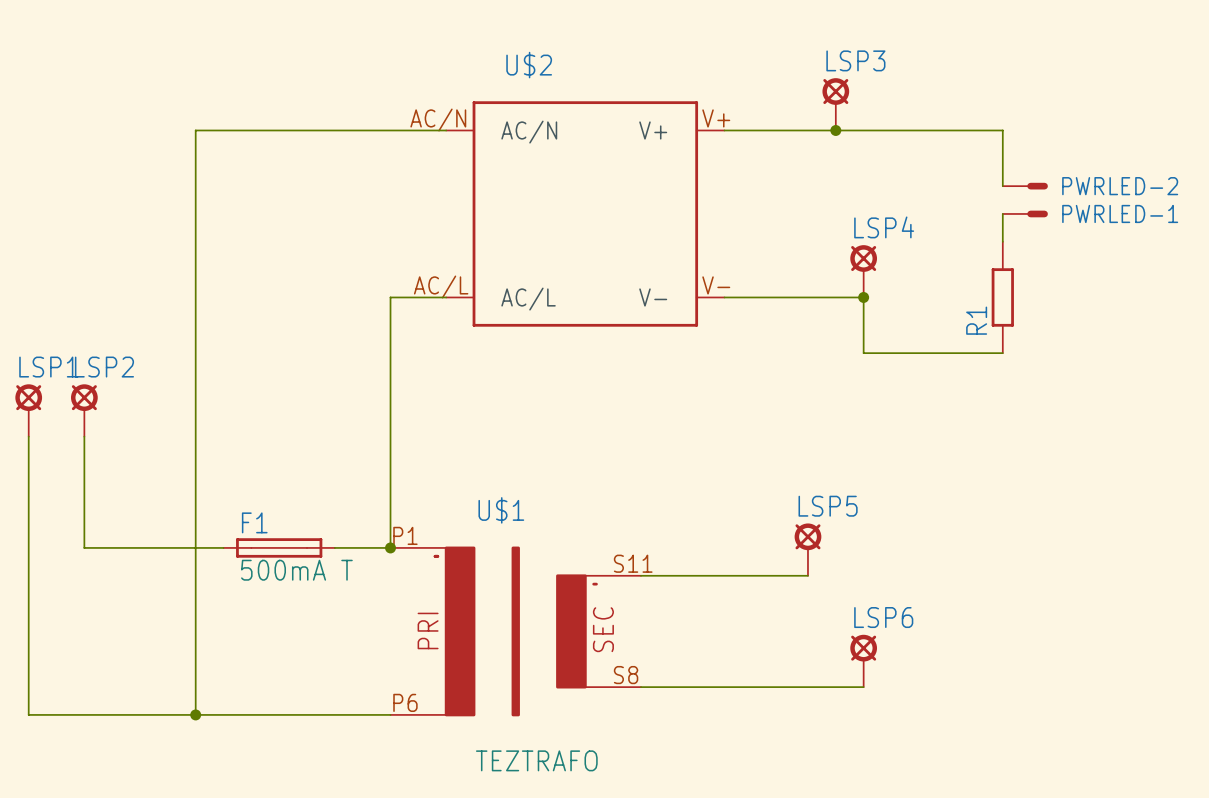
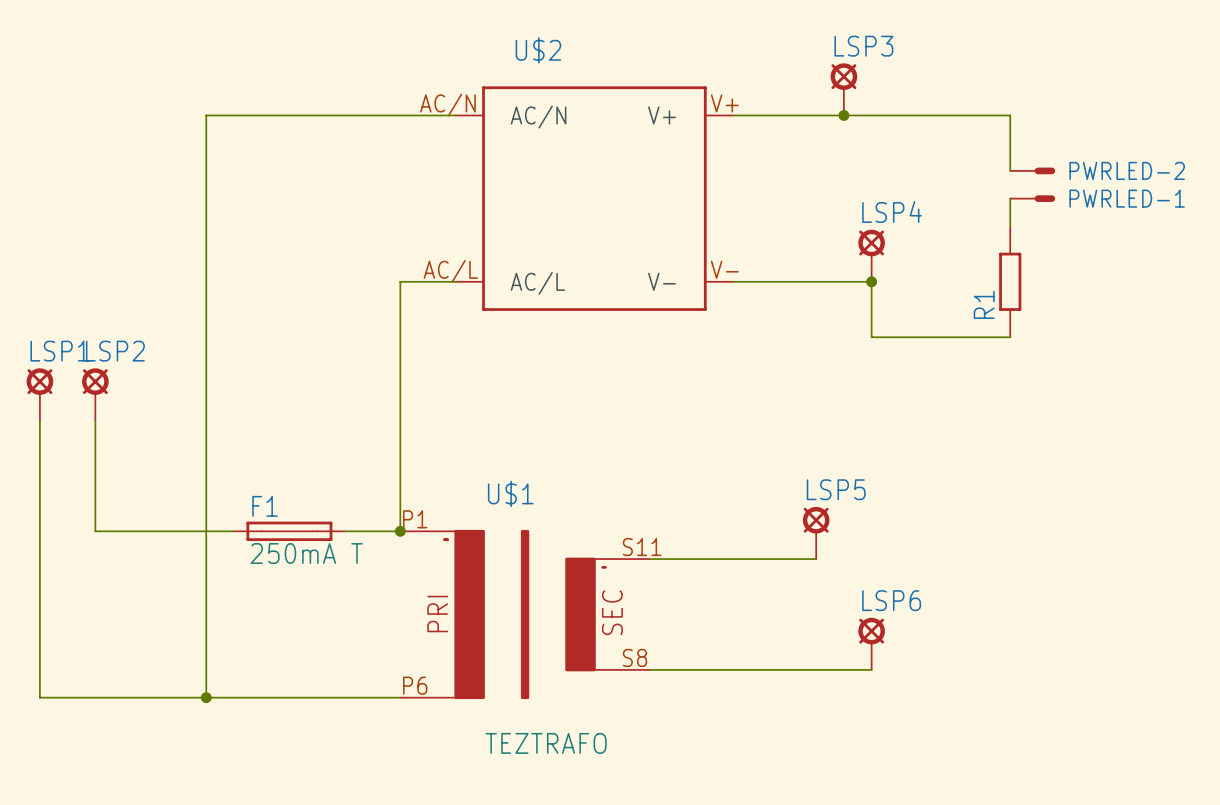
F1 value: 500mA T (296, 570) -> 250mA T (306, 553)

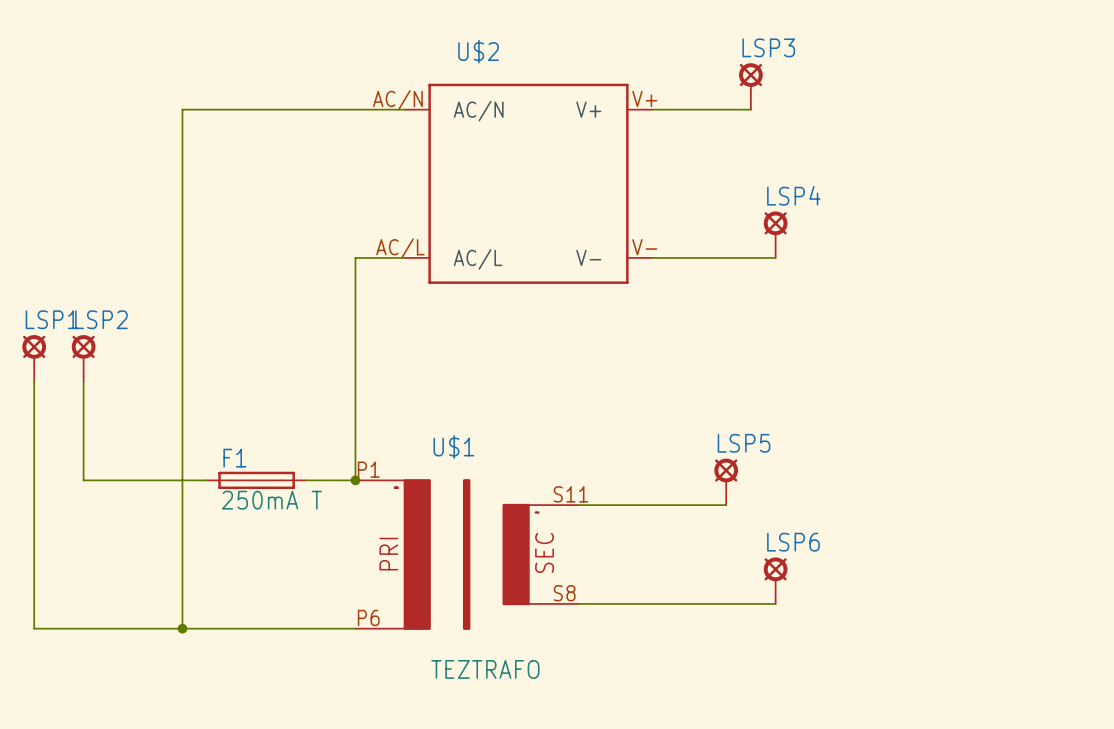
wire: (843, 115) (1010, 115) (1010, 170) -> none
junction: (843, 115) -> none
PWRLED-2: (1032, 170) -> none
wire: (1010, 198) (1010, 226) -> none
PWRLED-1: (1032, 198) -> none
wire: (871, 281) (871, 337) (1010, 337) -> none
junction: (871, 281) -> none
R1: (1010, 281) -> none

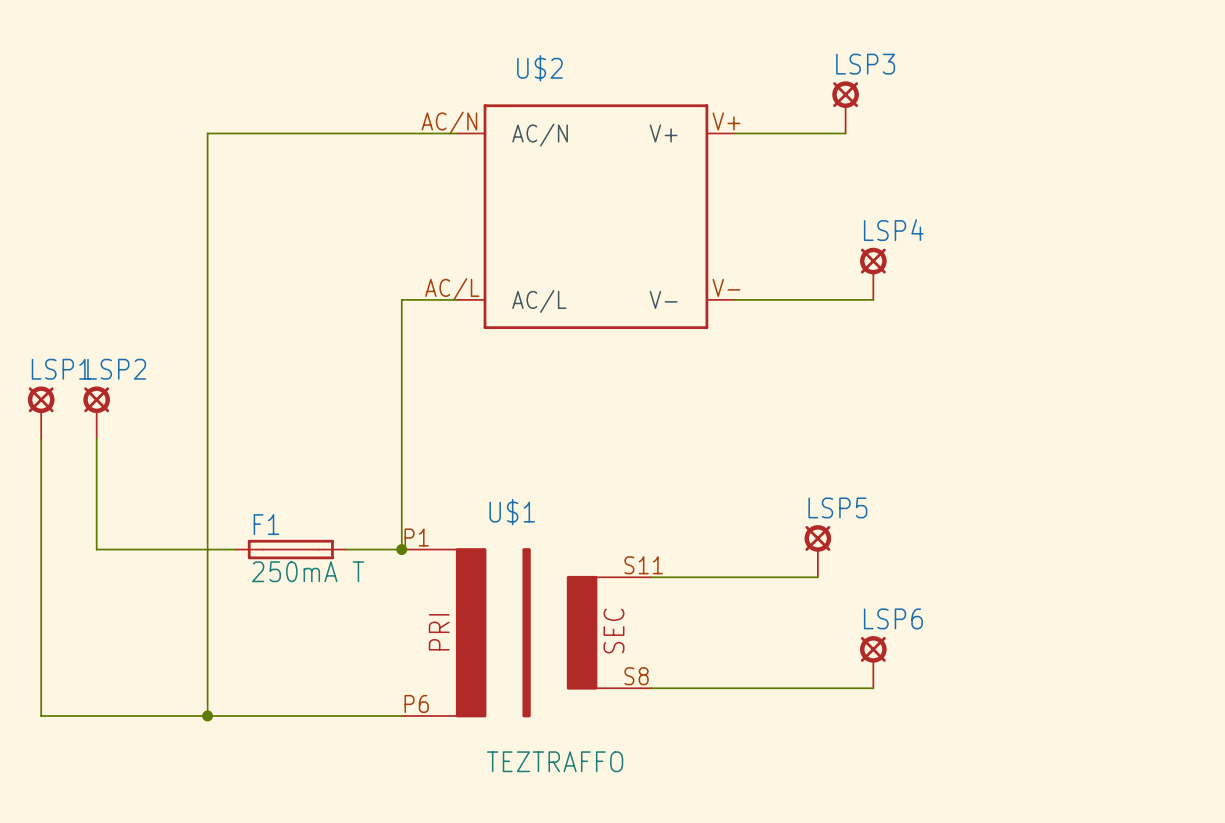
U$1 symbol: [355, 479, 578, 630] -> [401, 548, 652, 718]
U$1 value: TEZTRAFO (485, 669) -> TEZTRAFFO (555, 761)

